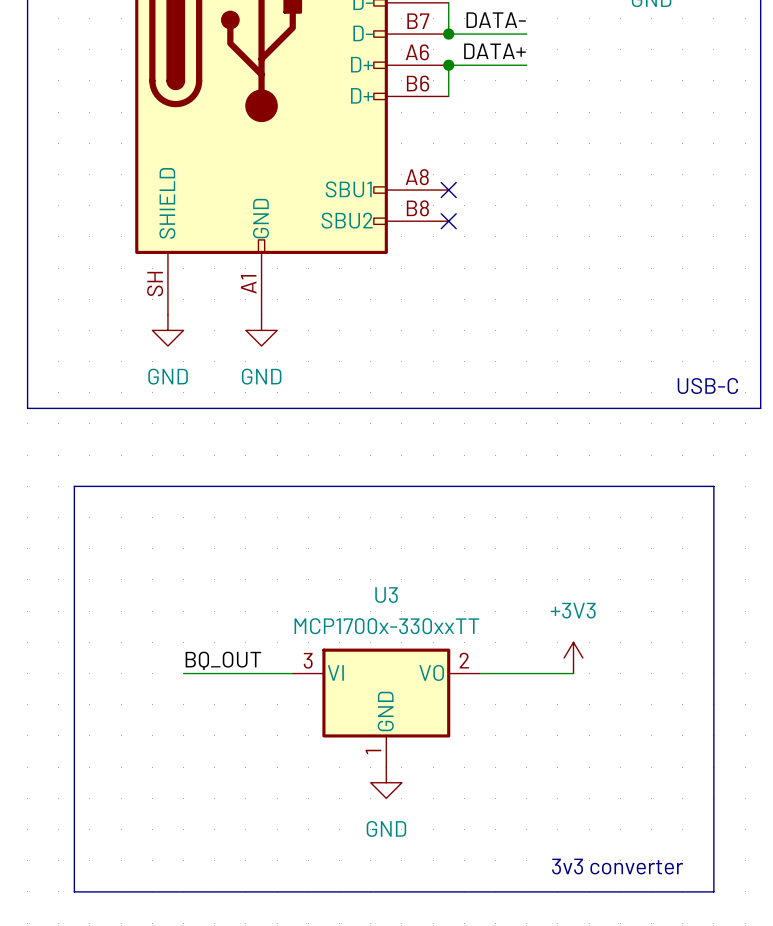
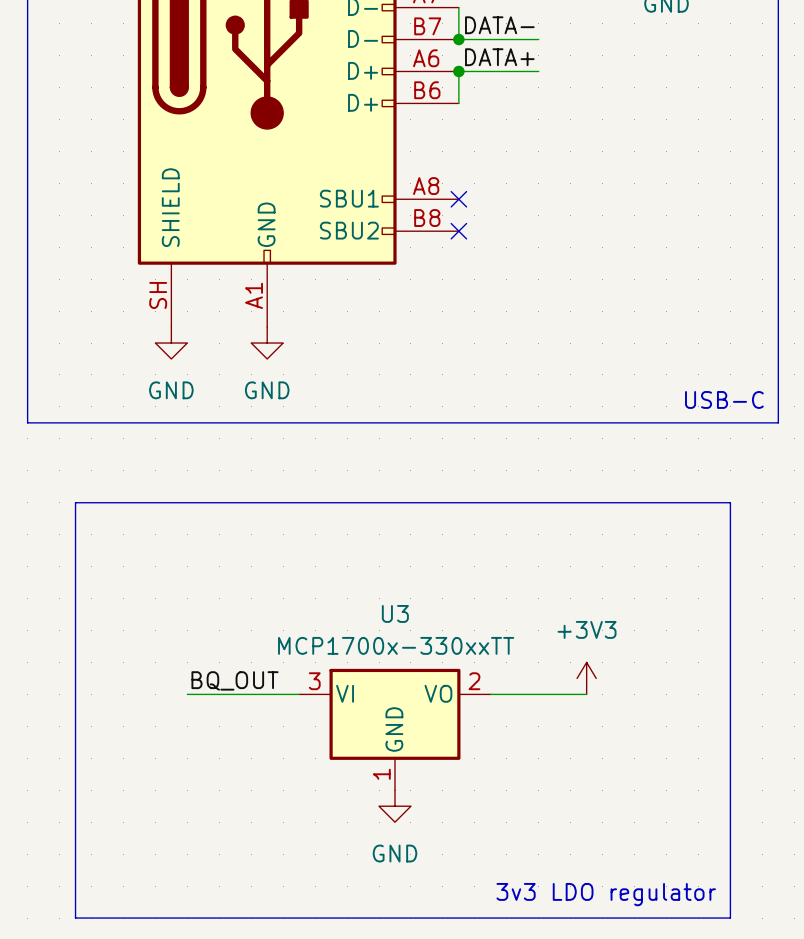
text: 3v3 converter (617, 866) -> none
text: none -> 3v3 LDO regulator (606, 894)

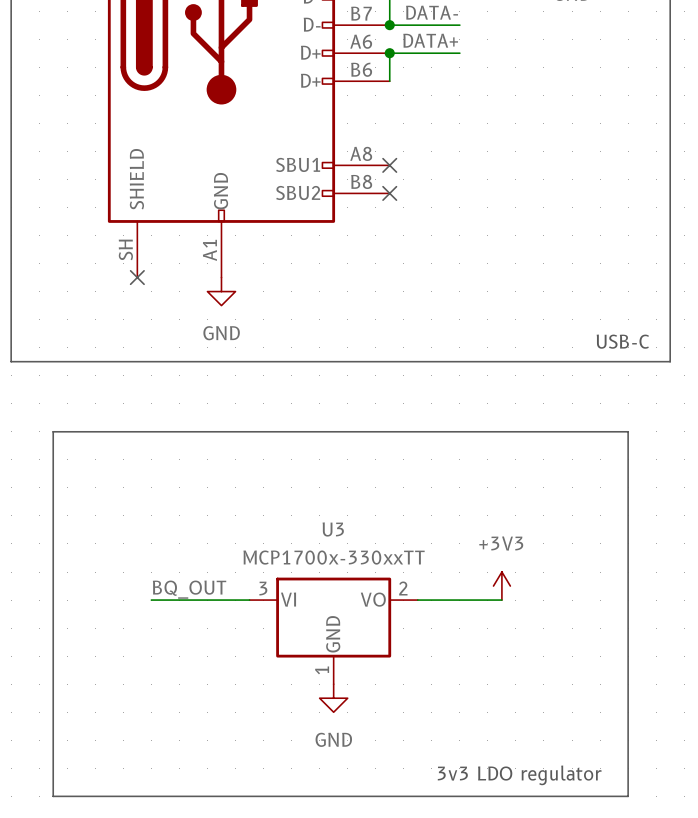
no-connect mark: none -> (137, 277)
power symbol: GND (171, 343) -> none

